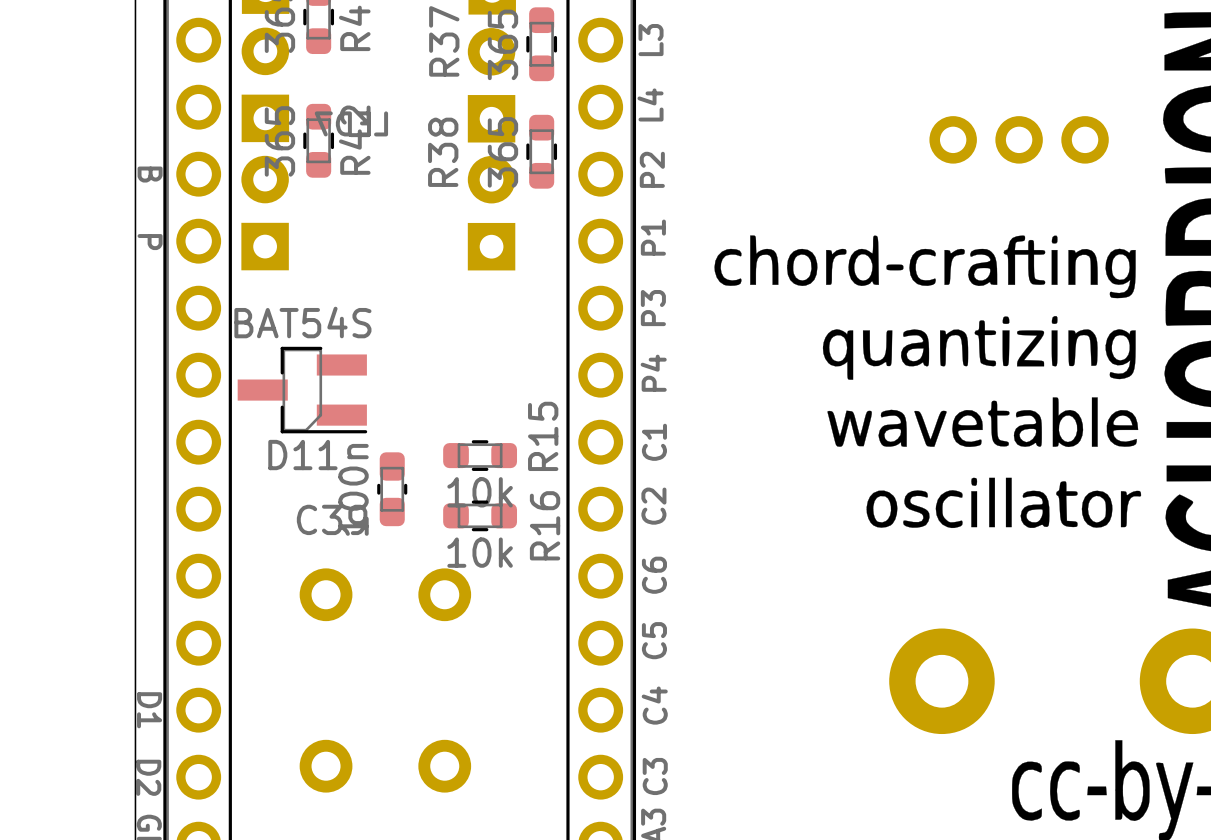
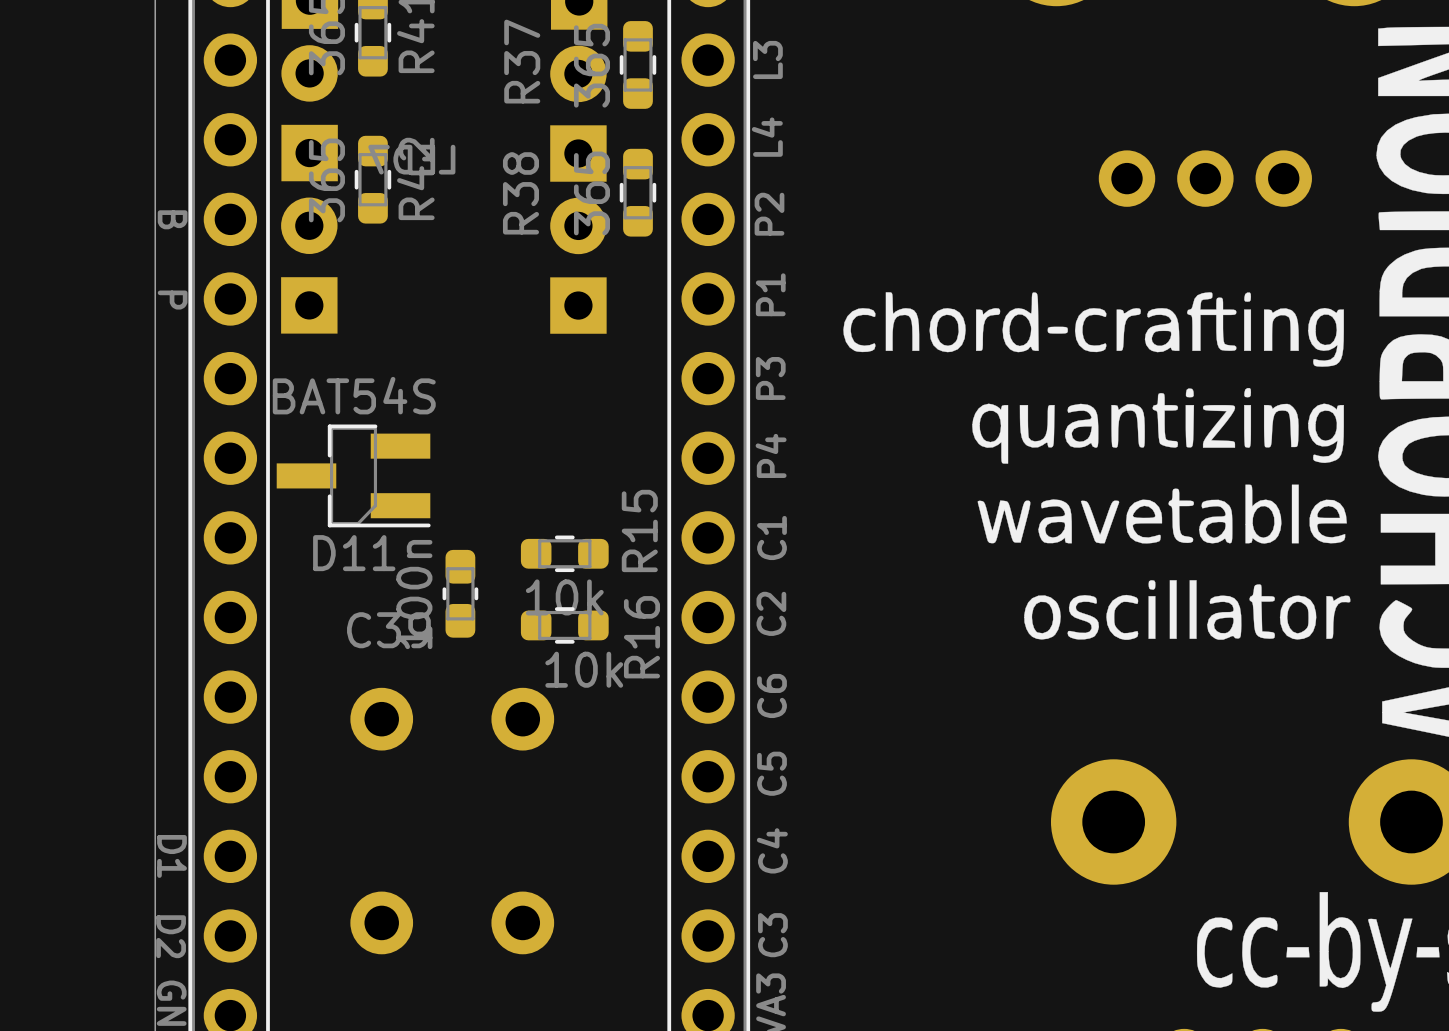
R16 value position: 10k (480, 552) -> 10k (584, 669)

